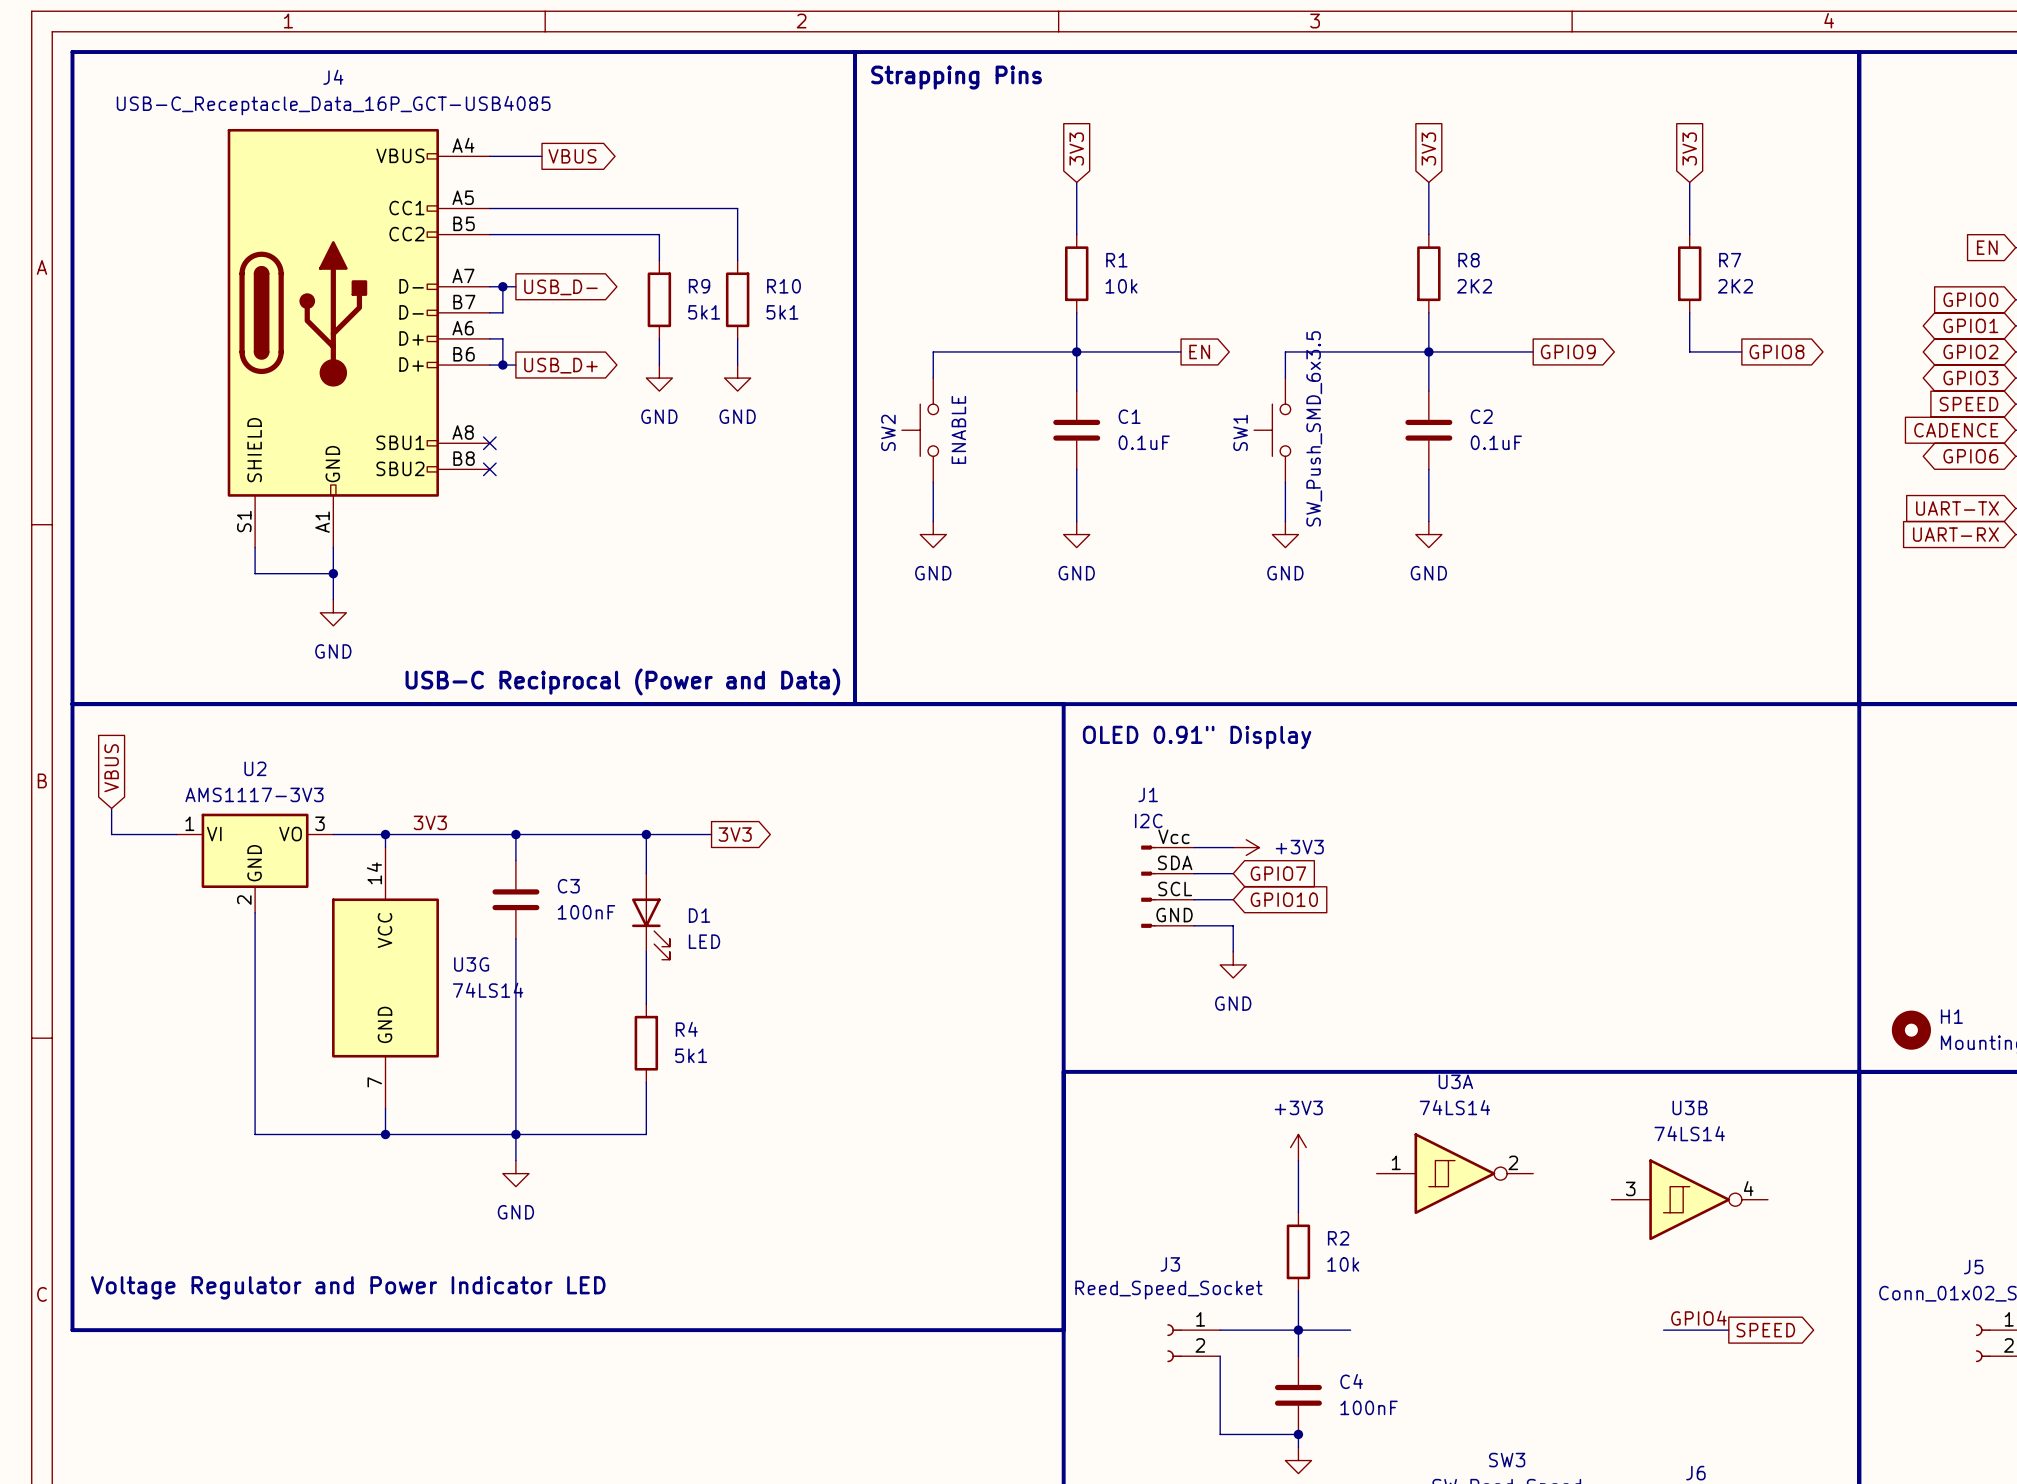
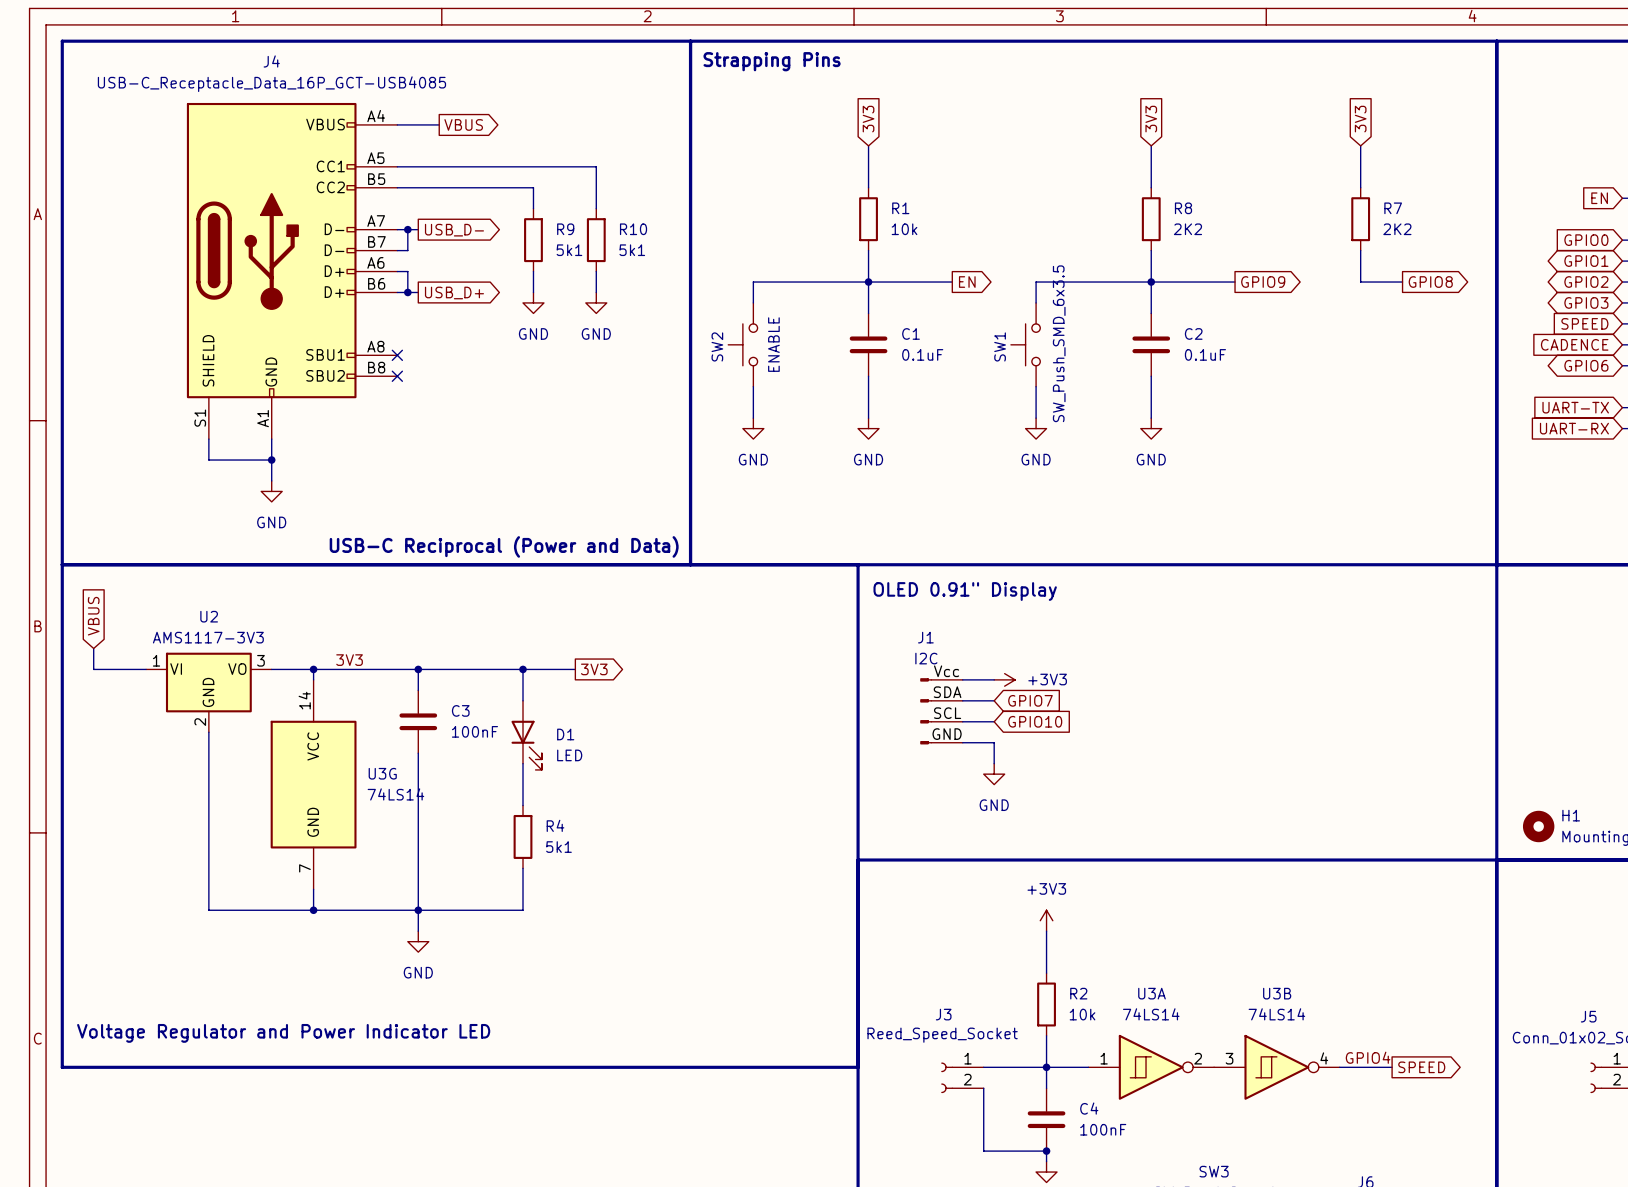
U3A position: (1454, 1173) -> (1151, 1067)
U3B position: (1689, 1199) -> (1276, 1067)

